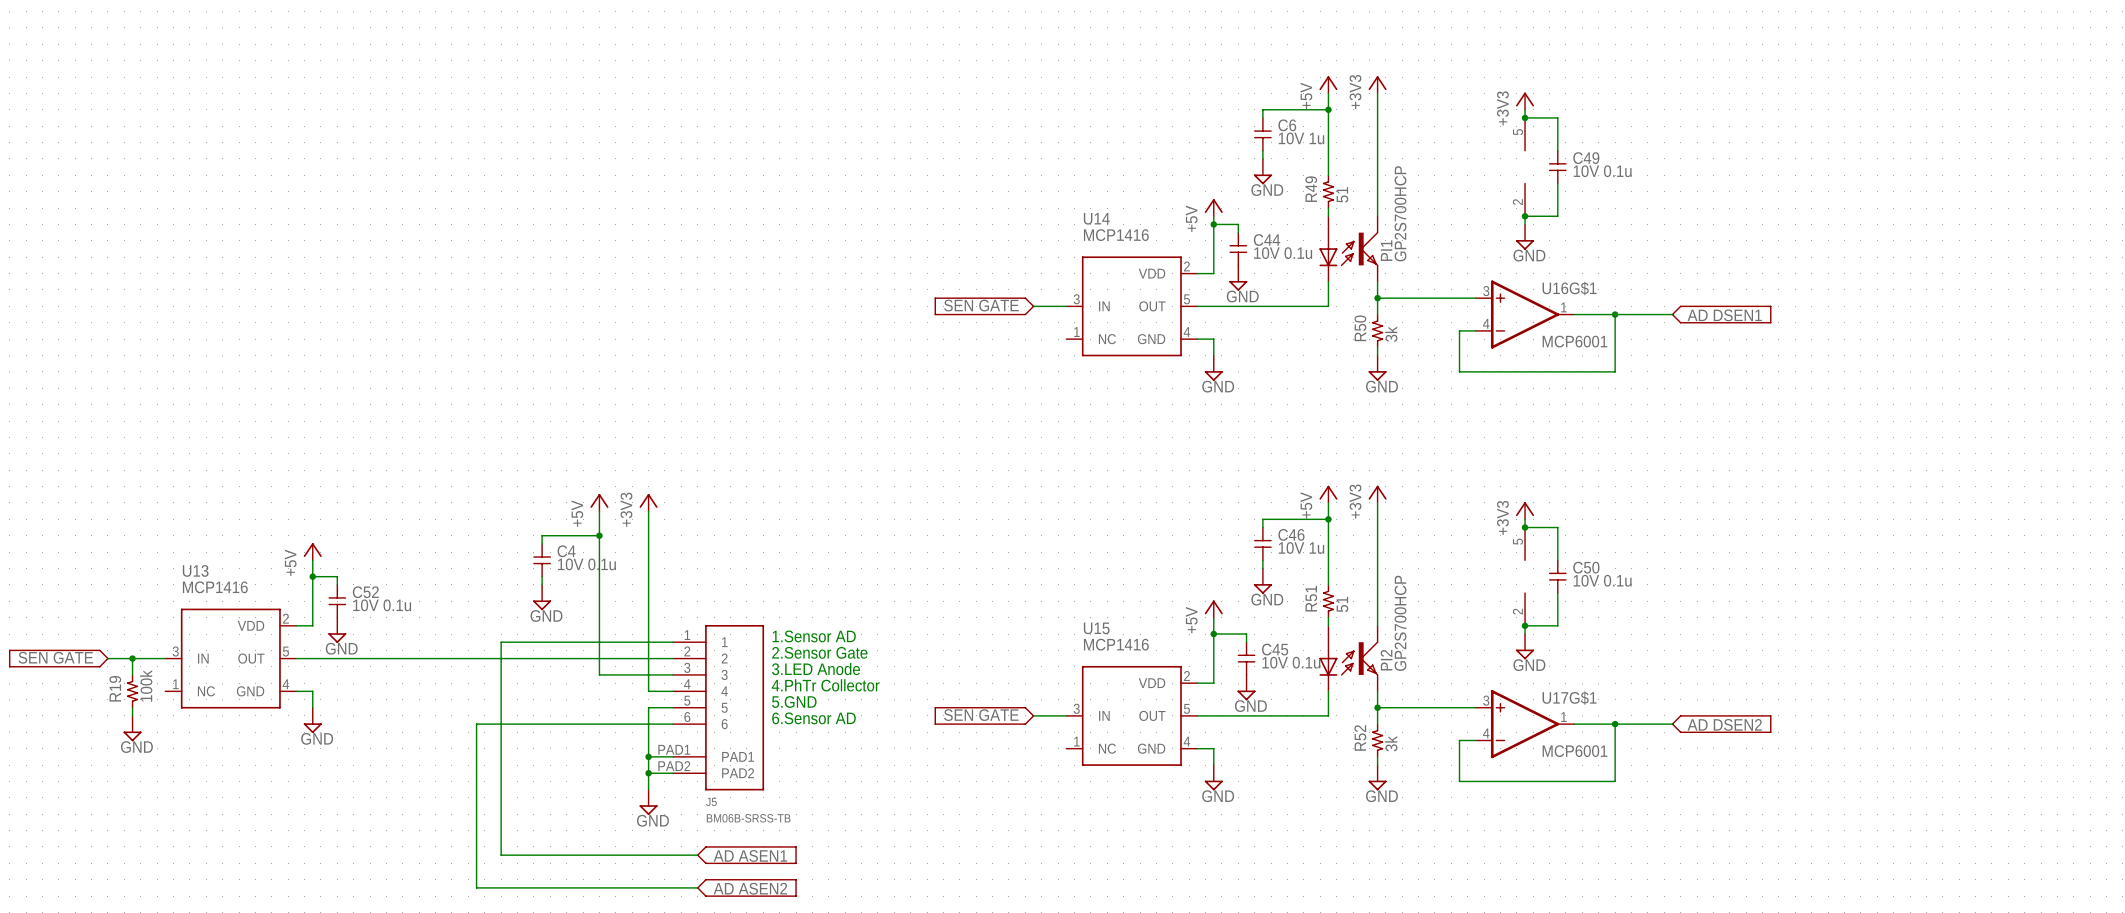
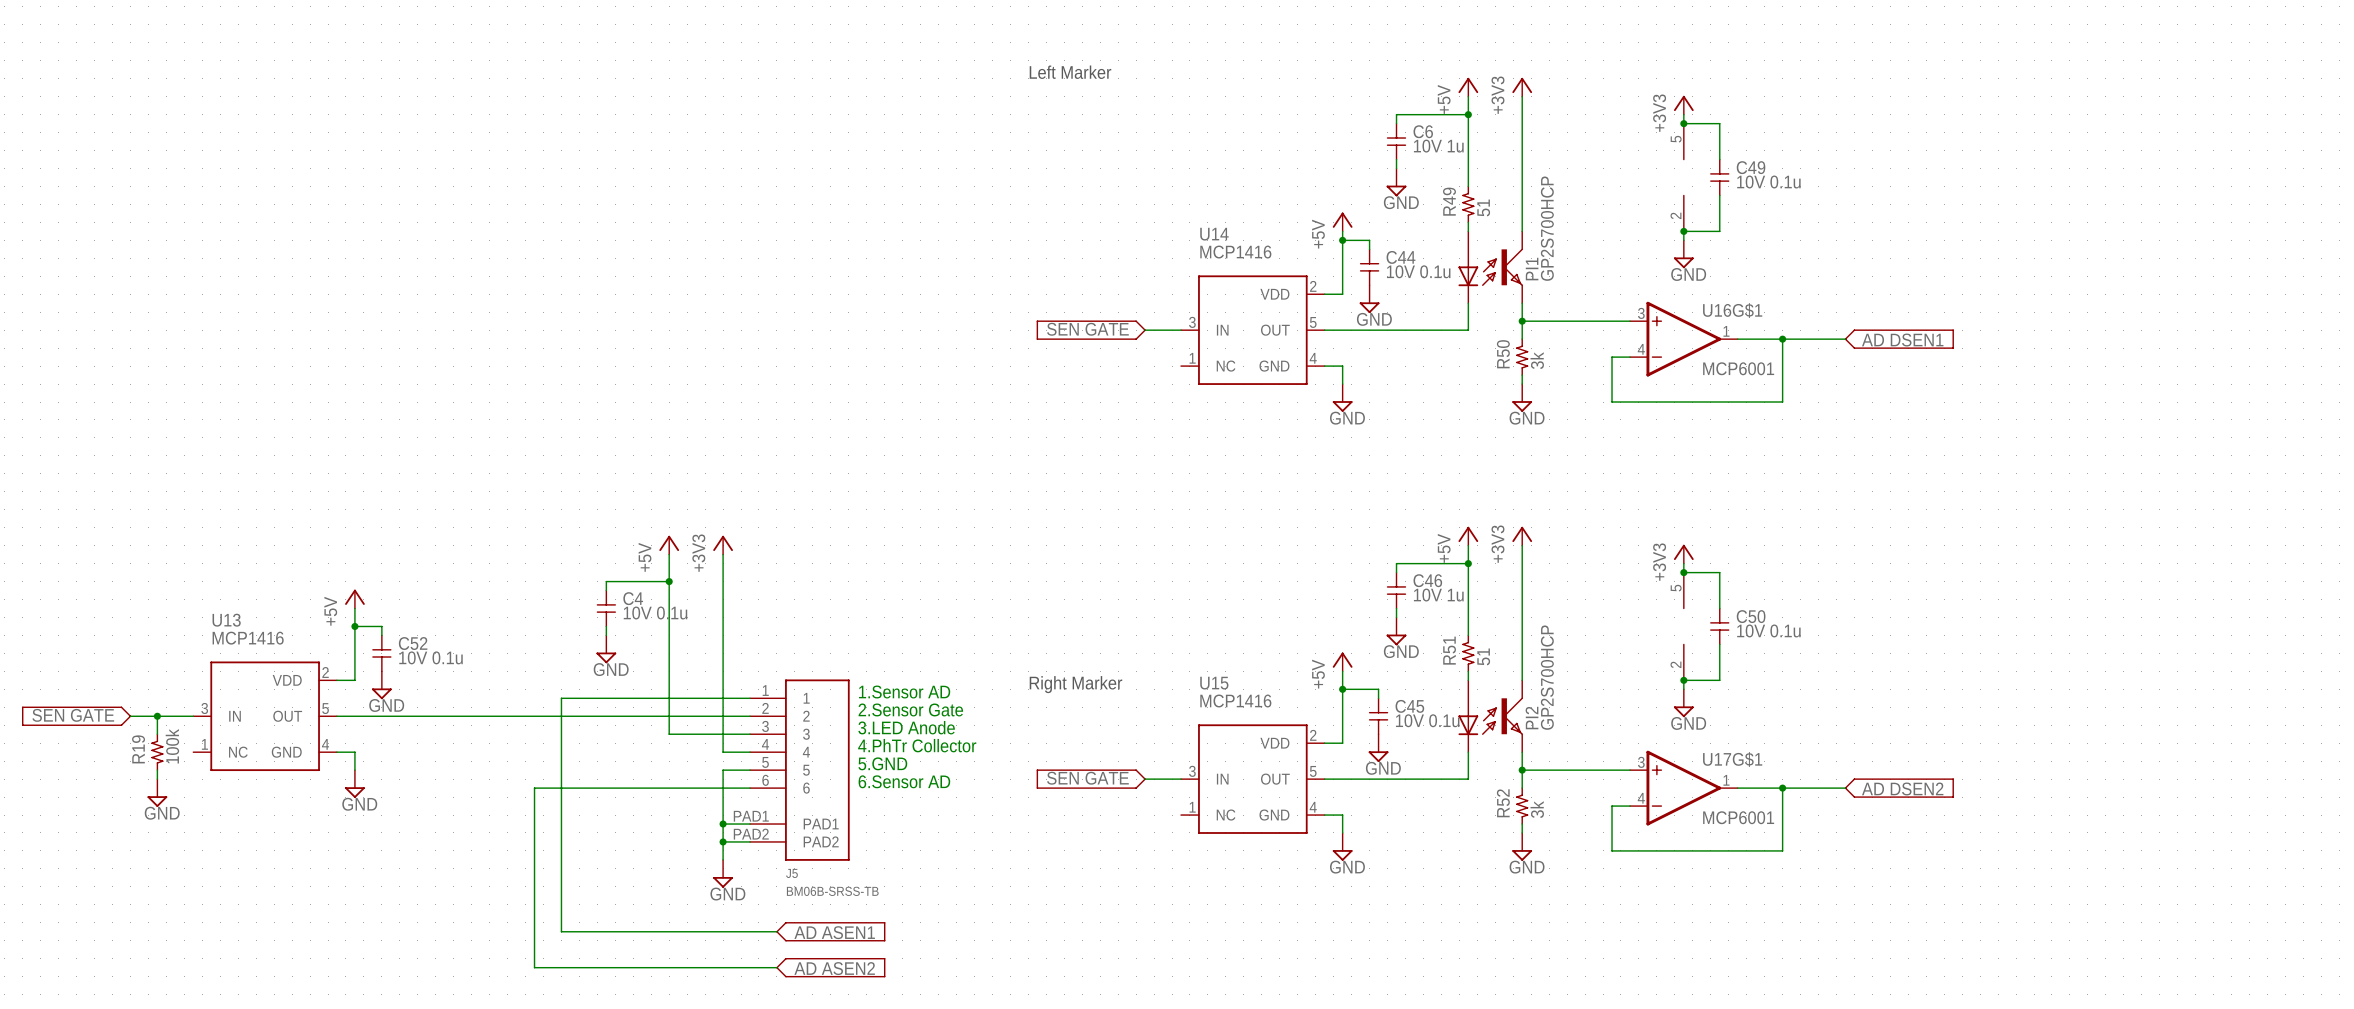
text: none -> Left Marker (1070, 72)
text: none -> Right Marker (1075, 684)

